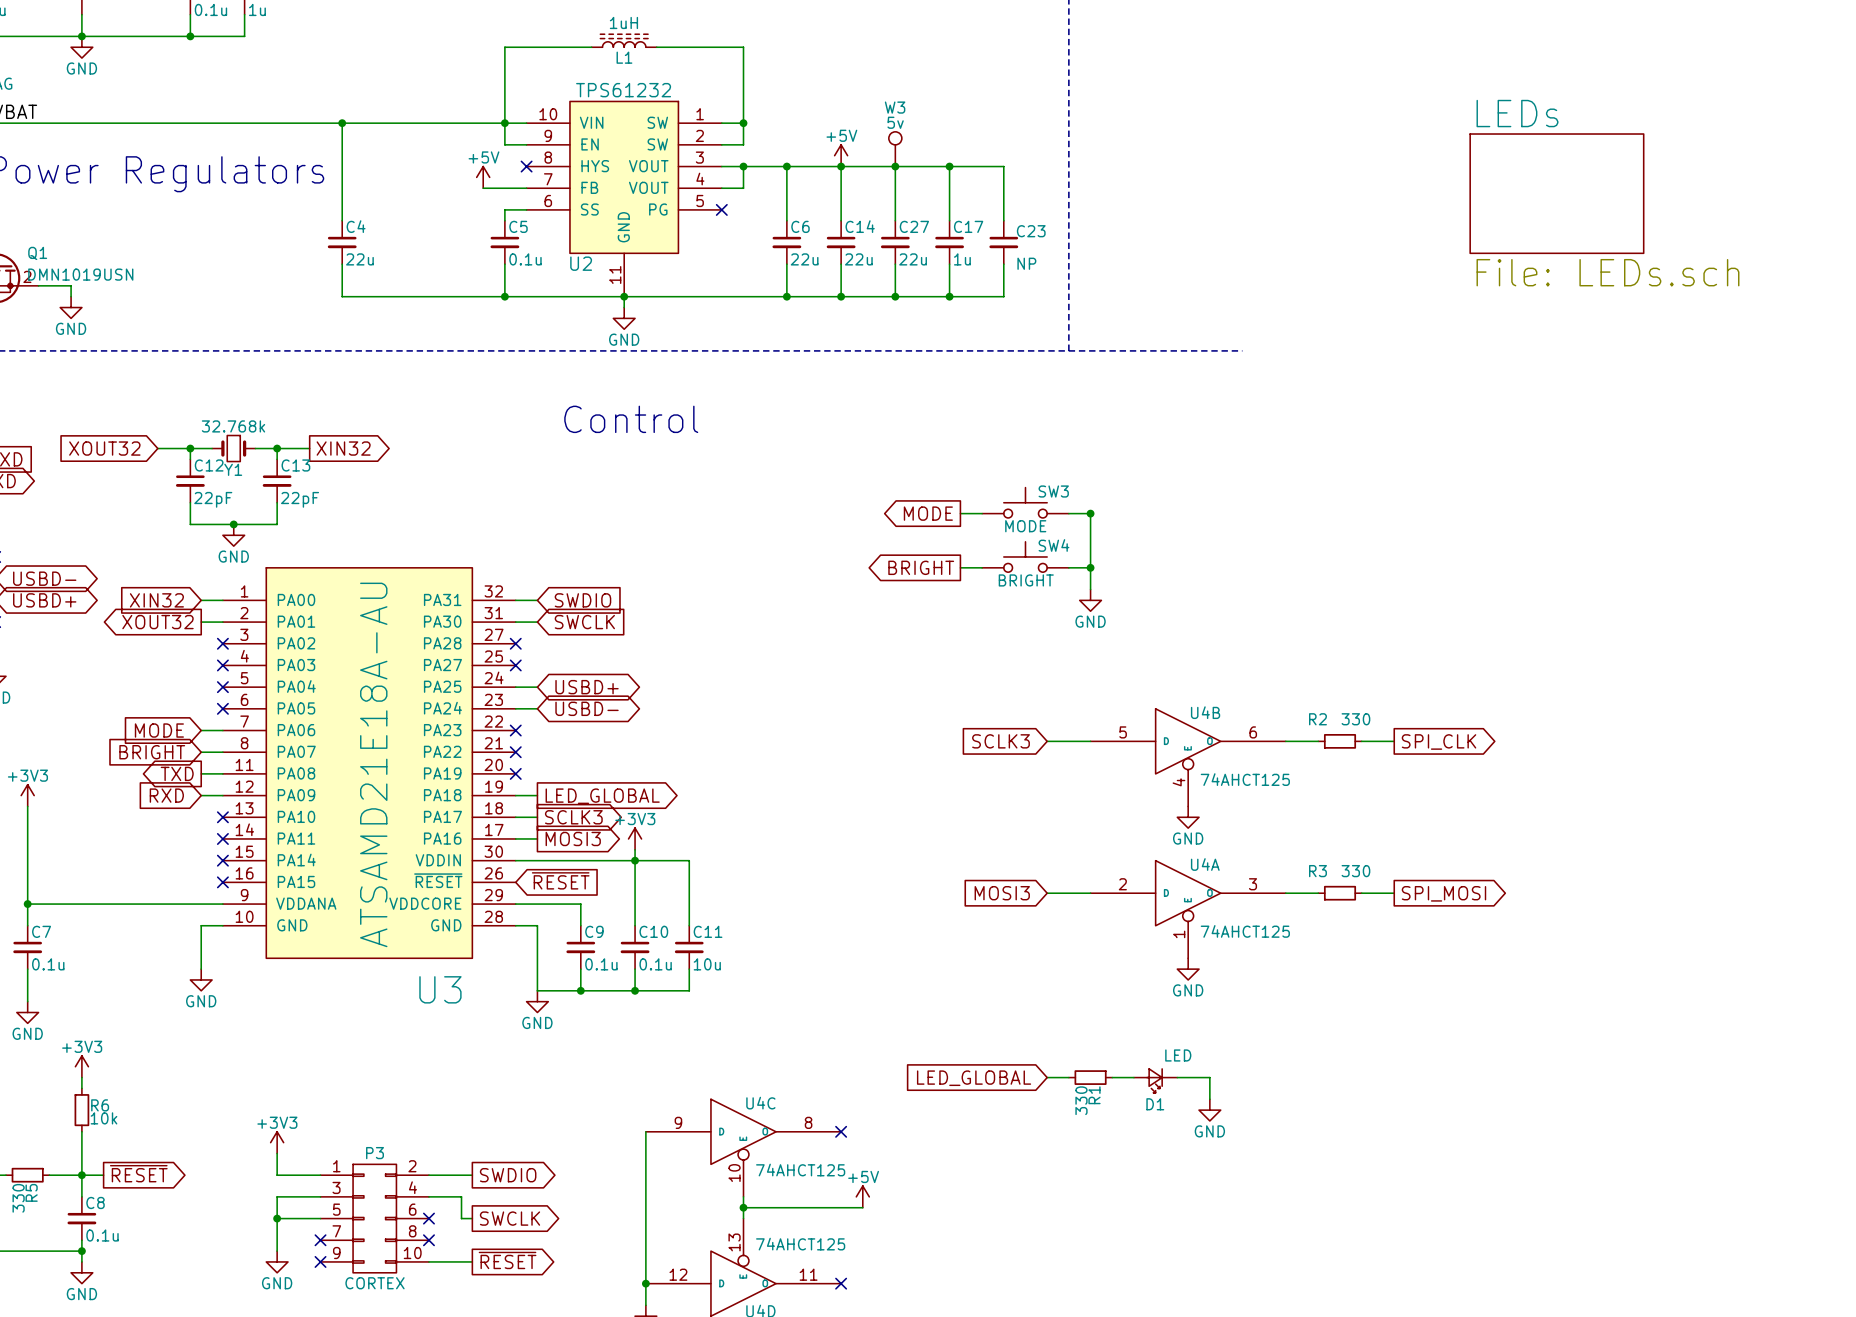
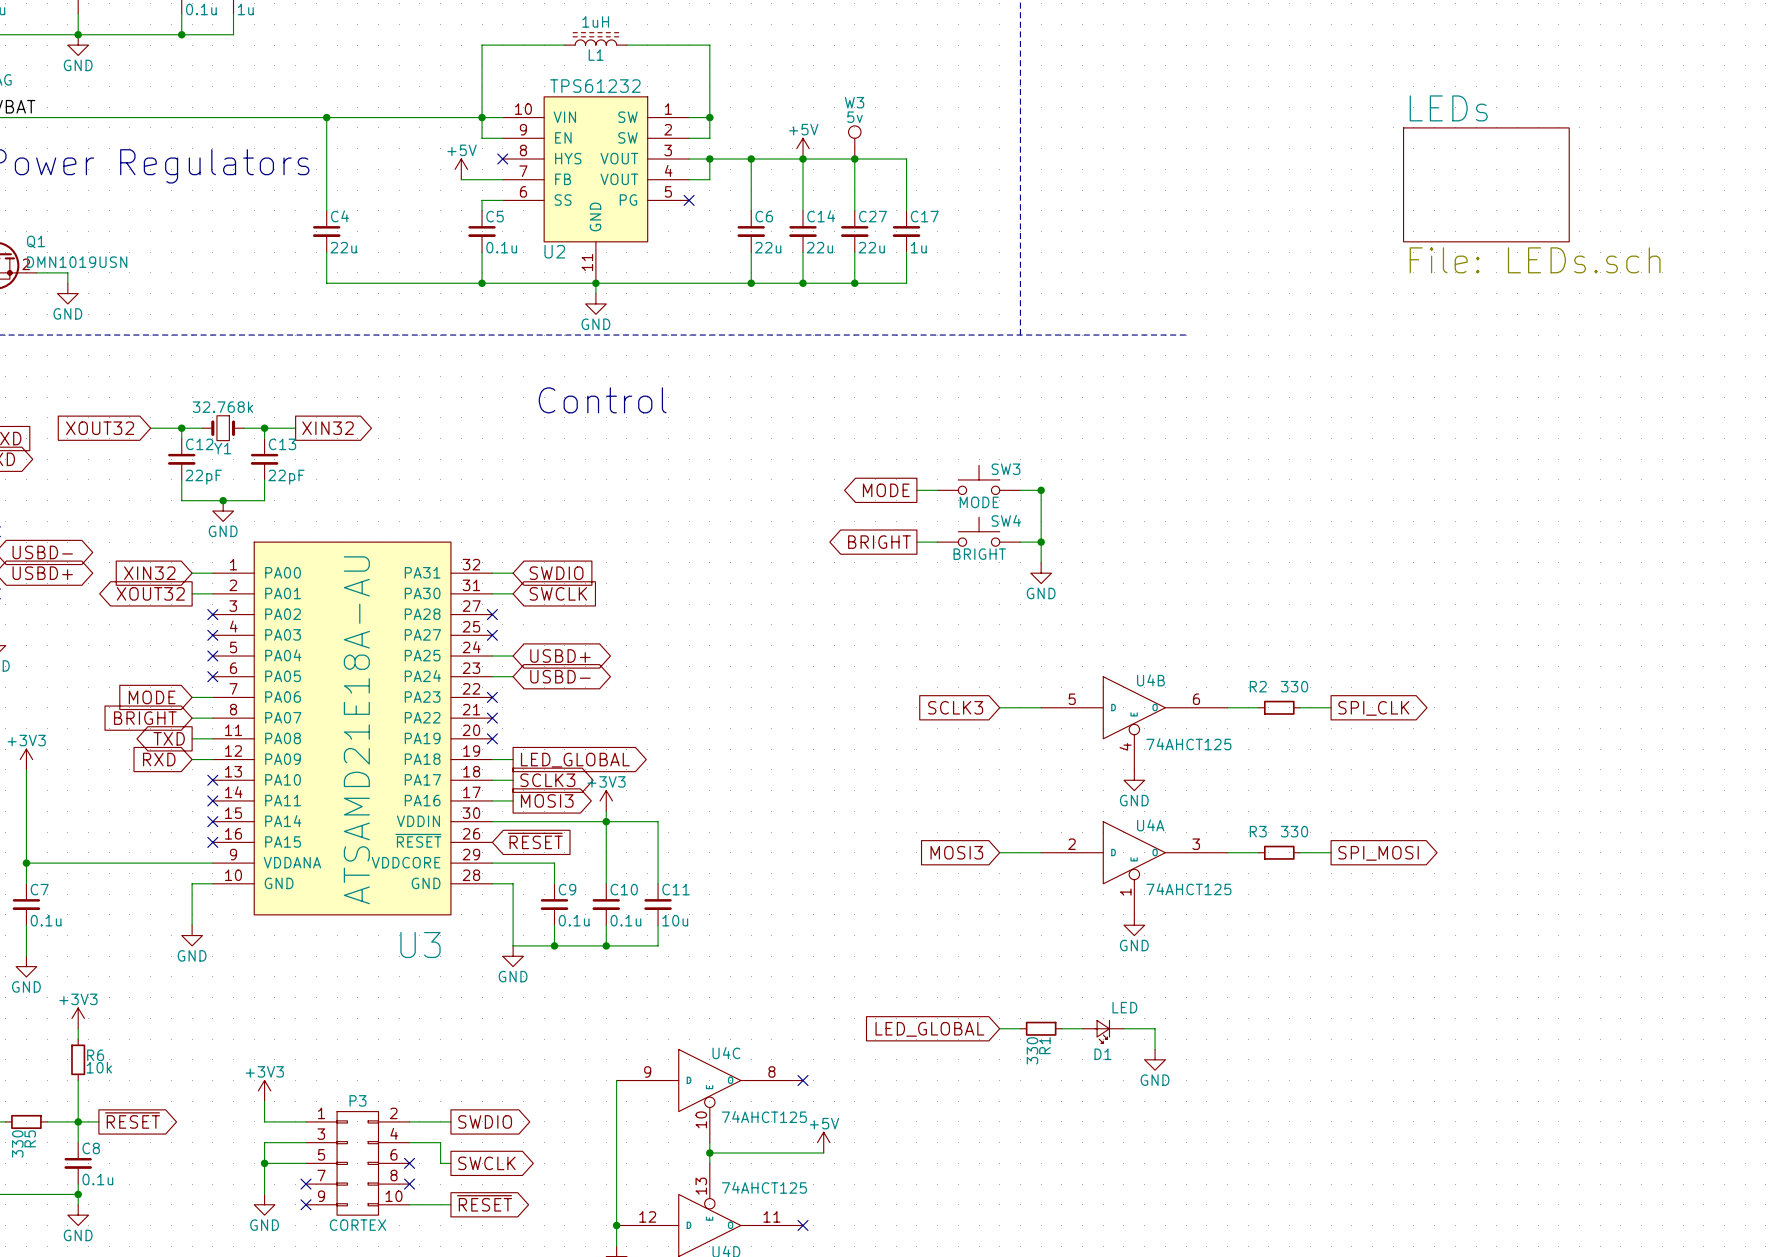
wire: (949, 166) (1003, 166) (1003, 220) -> none
junction: (949, 166) -> none
C23: NP (1003, 242) -> none
wire: (1003, 264) (1003, 296) (949, 296) -> none
junction: (949, 296) -> none

